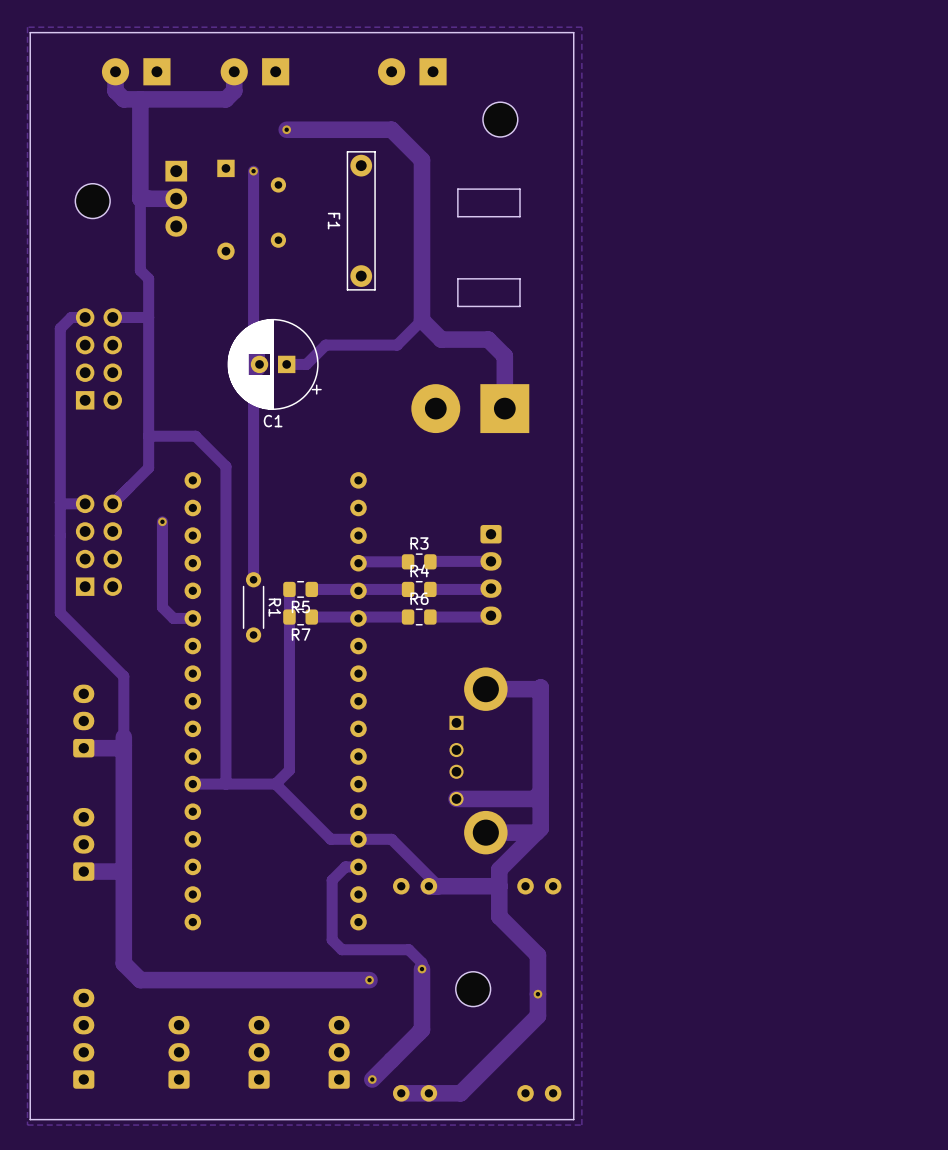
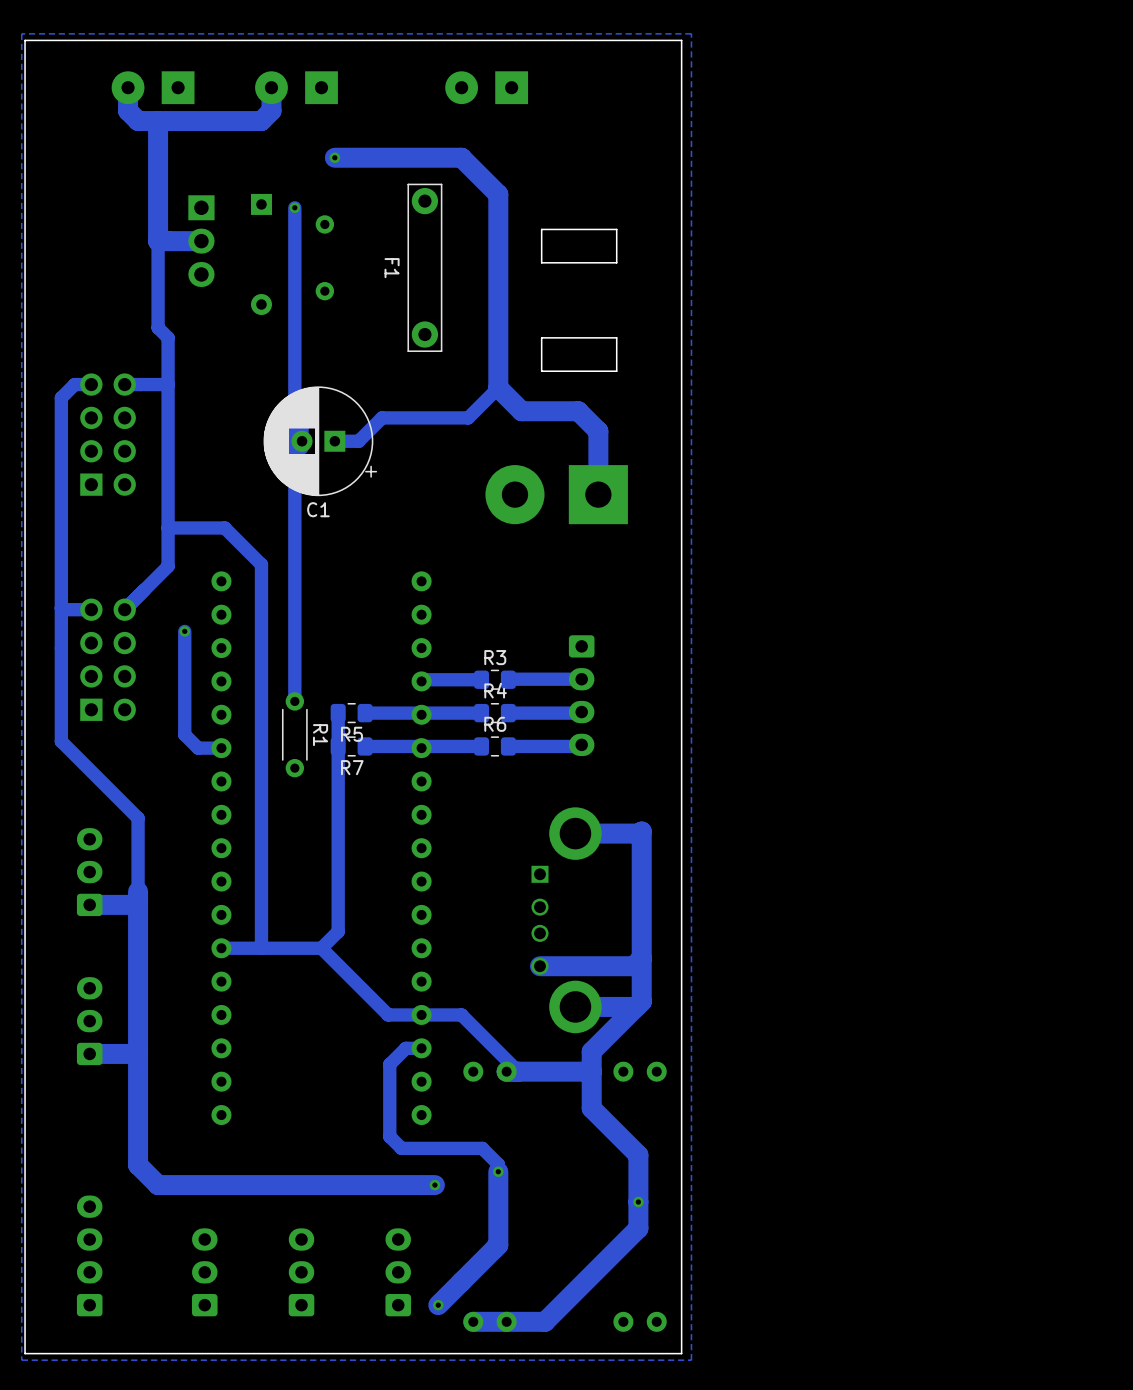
part: (500, 119) -> none
part: (92, 201) -> none
part: (473, 989) -> none

